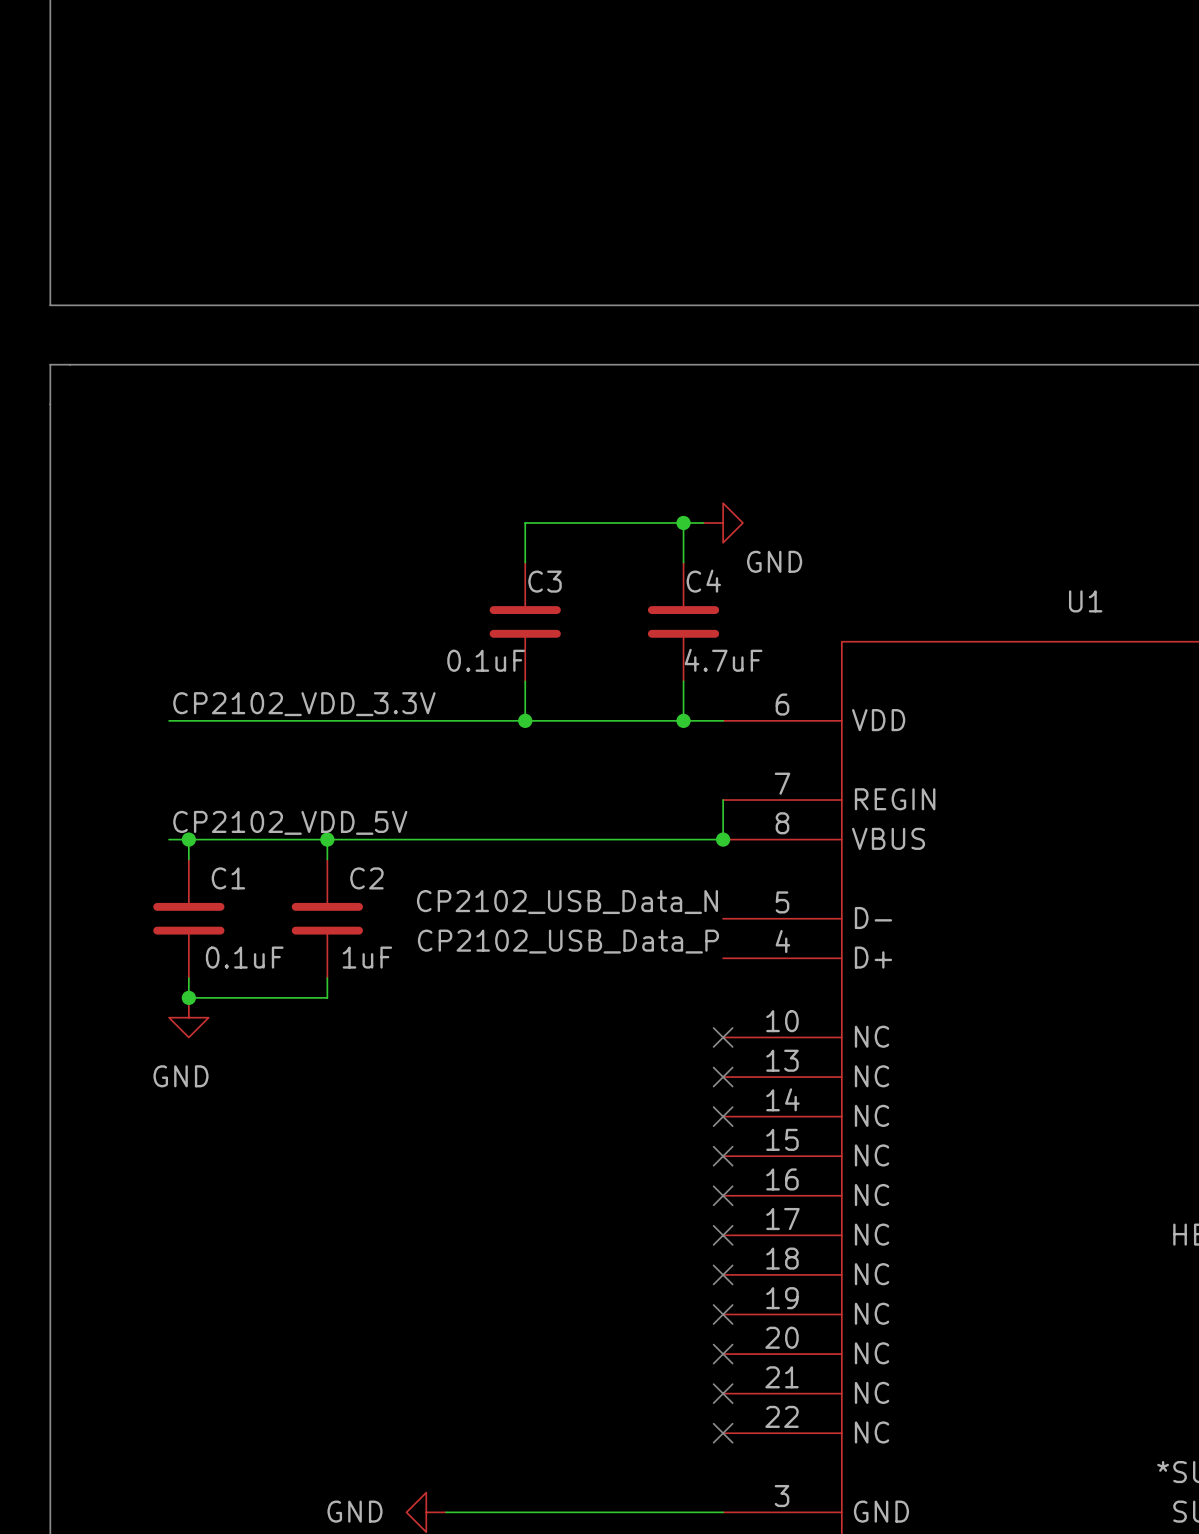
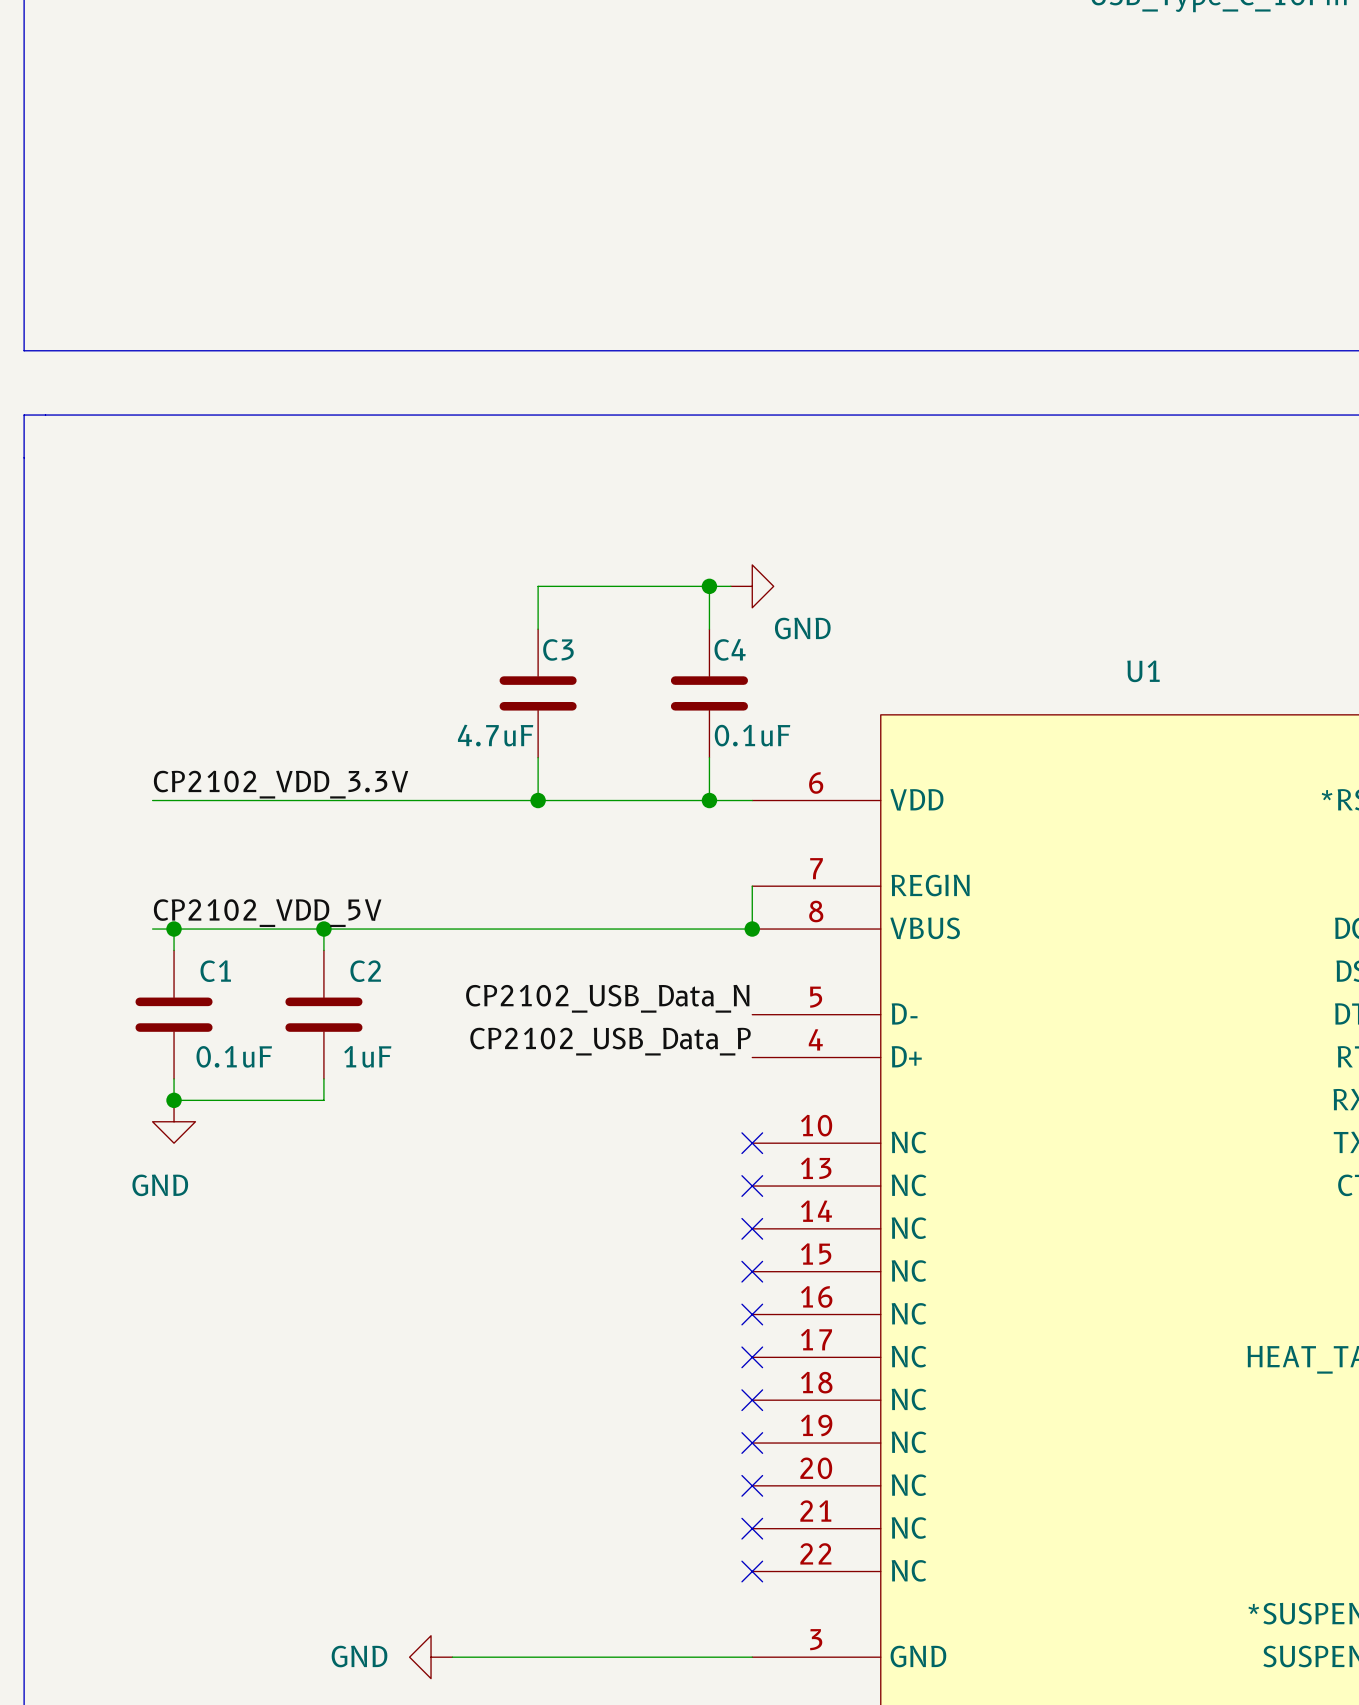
C3 value: 0.1uF (486, 660) -> 4.7uF (495, 735)
C4 value: 4.7uF (723, 660) -> 0.1uF (752, 735)

